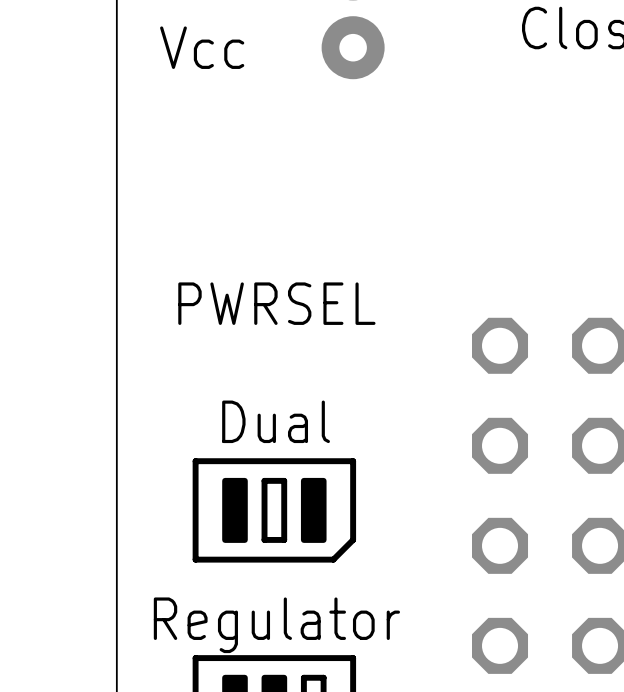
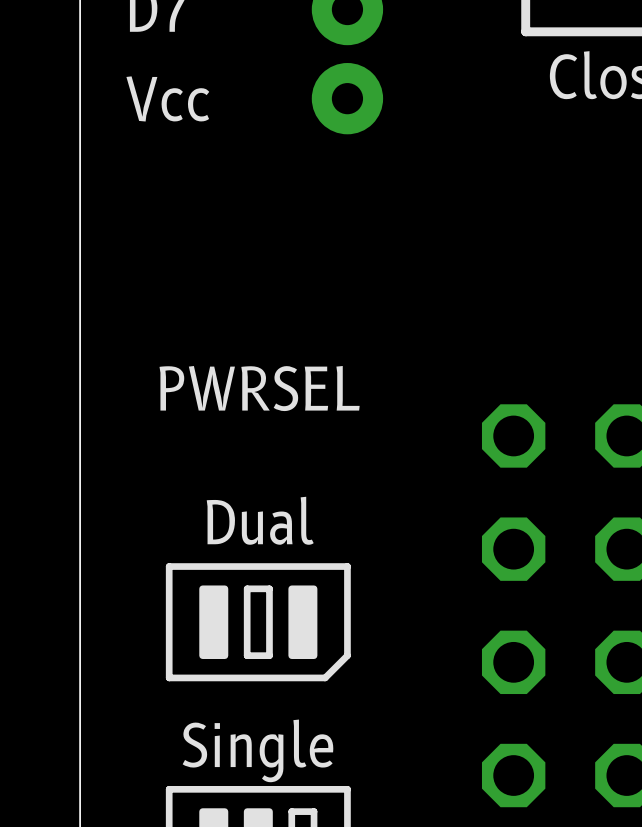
text: Regulator (276, 625) -> Single (257, 750)

